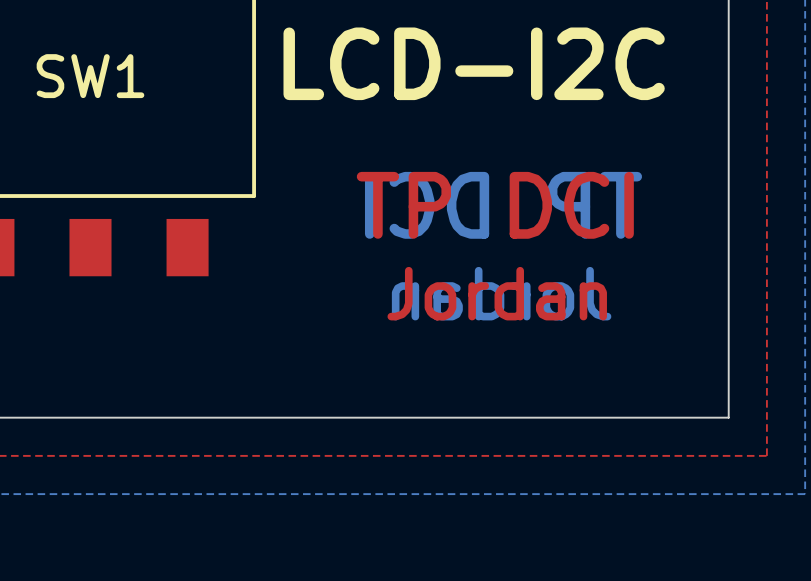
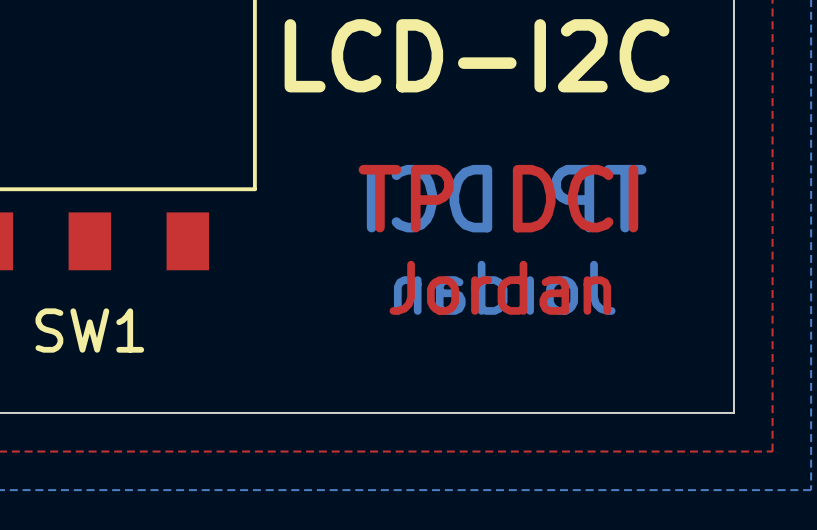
SW1 name position: SW1 (90, 76) -> SW1 (89, 330)

